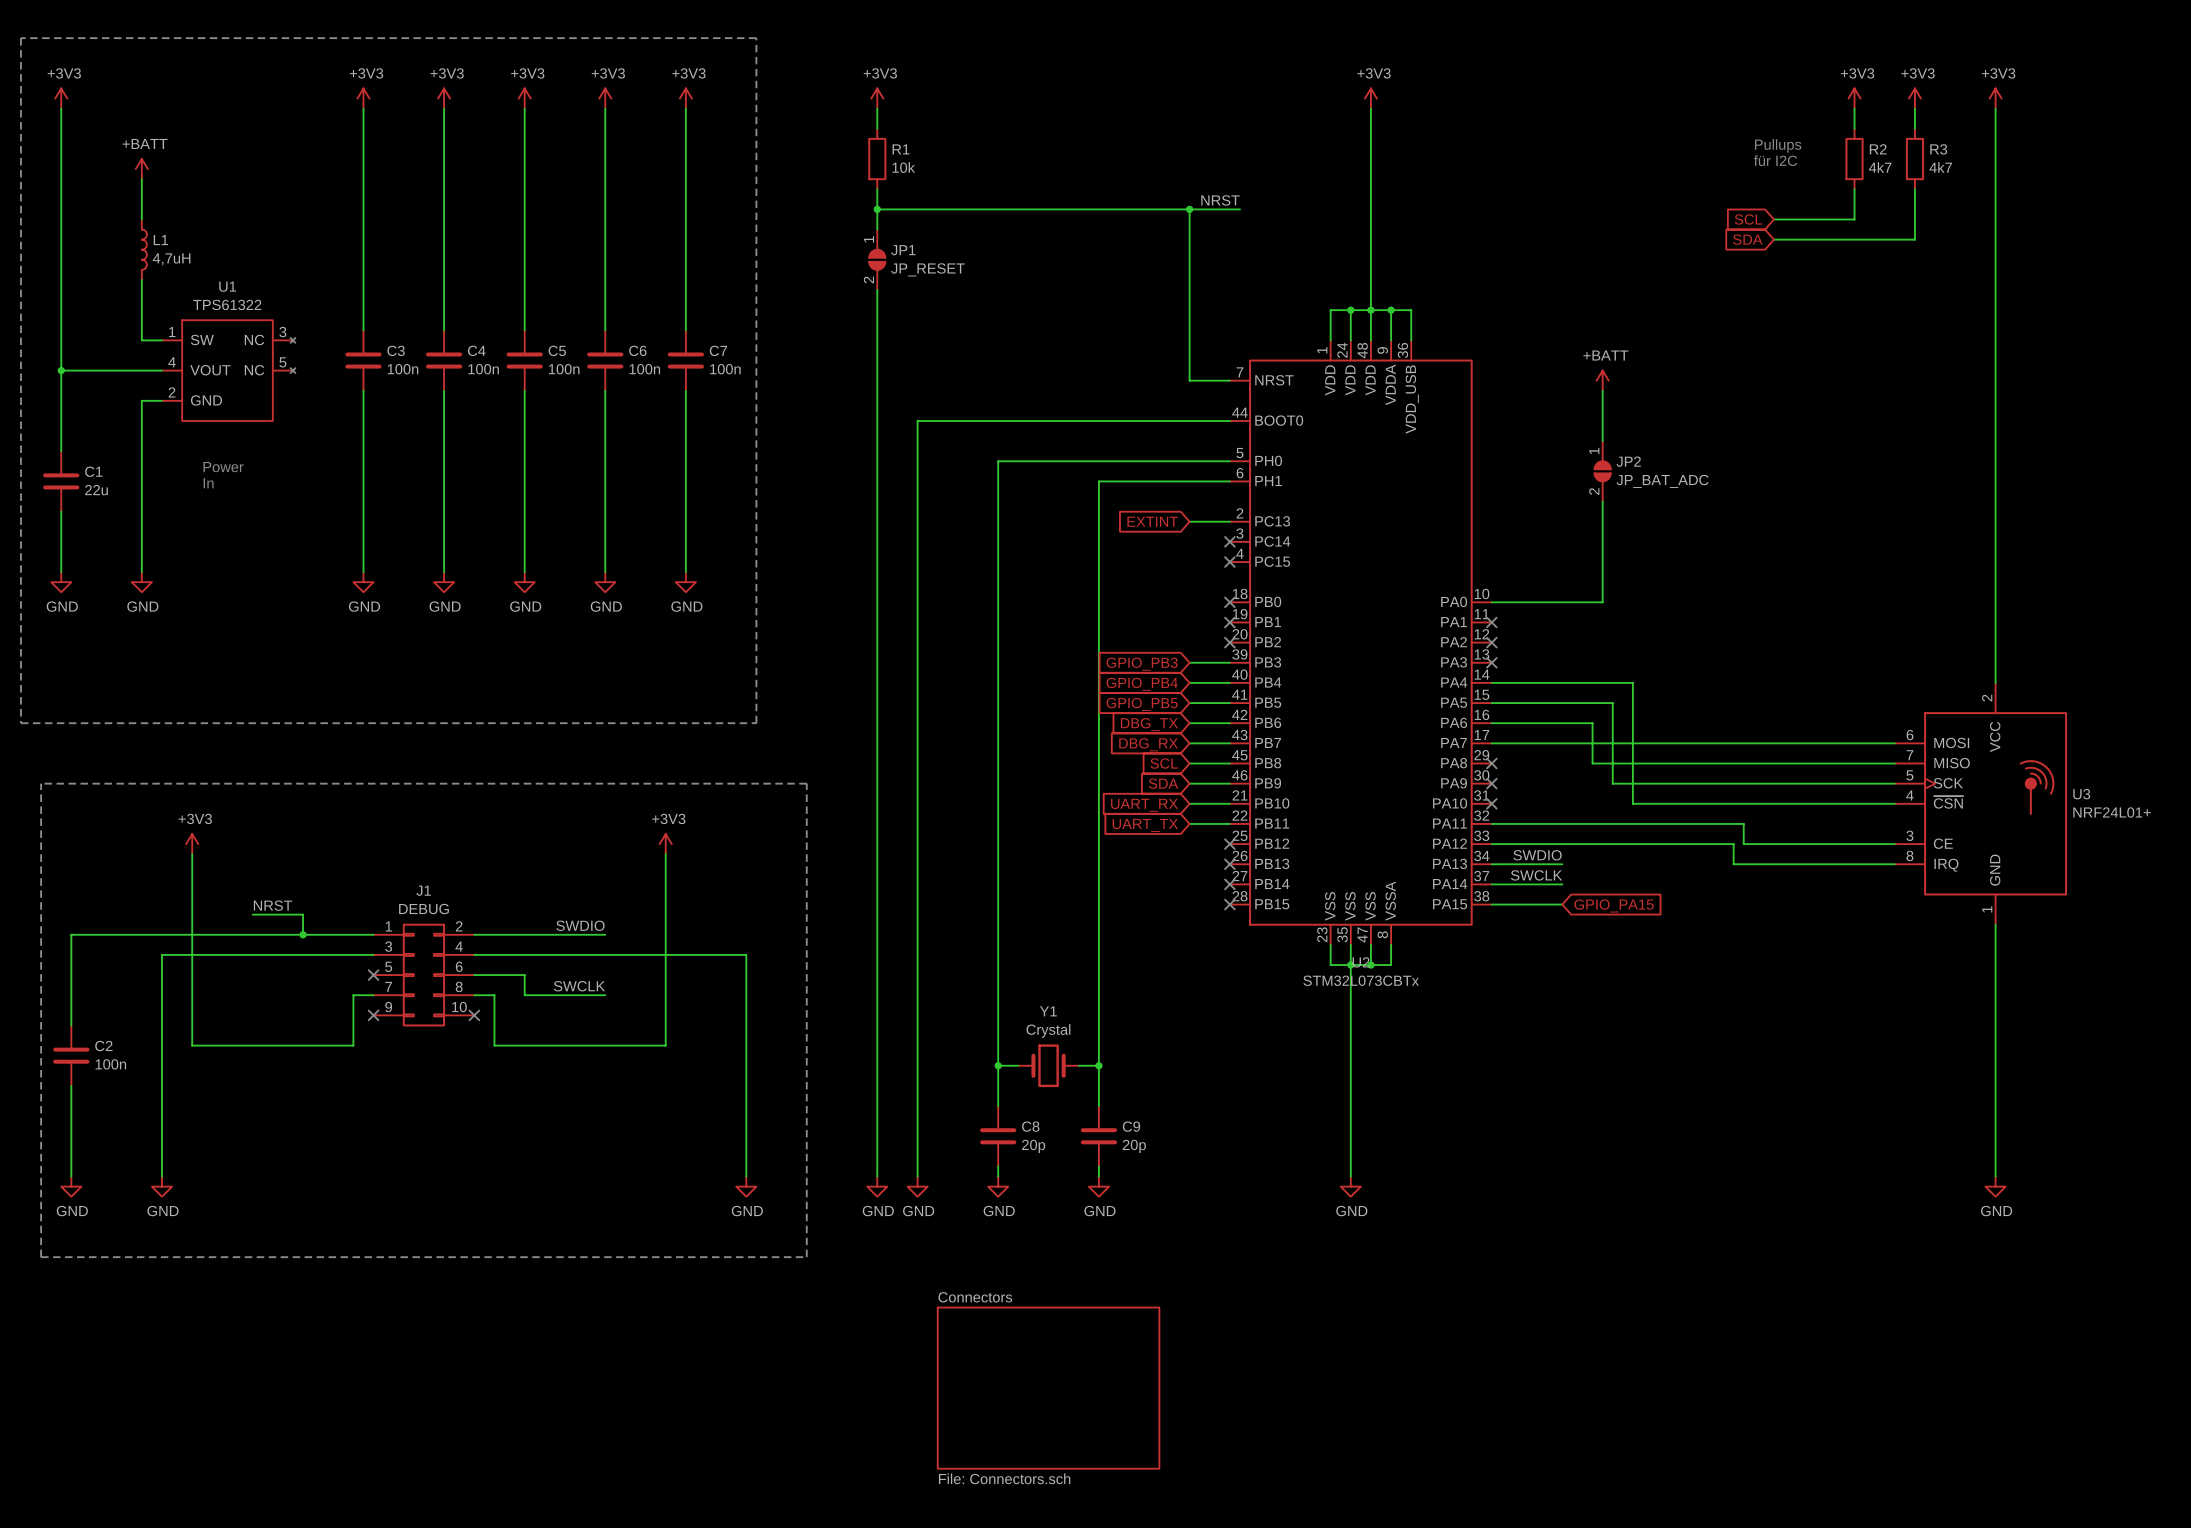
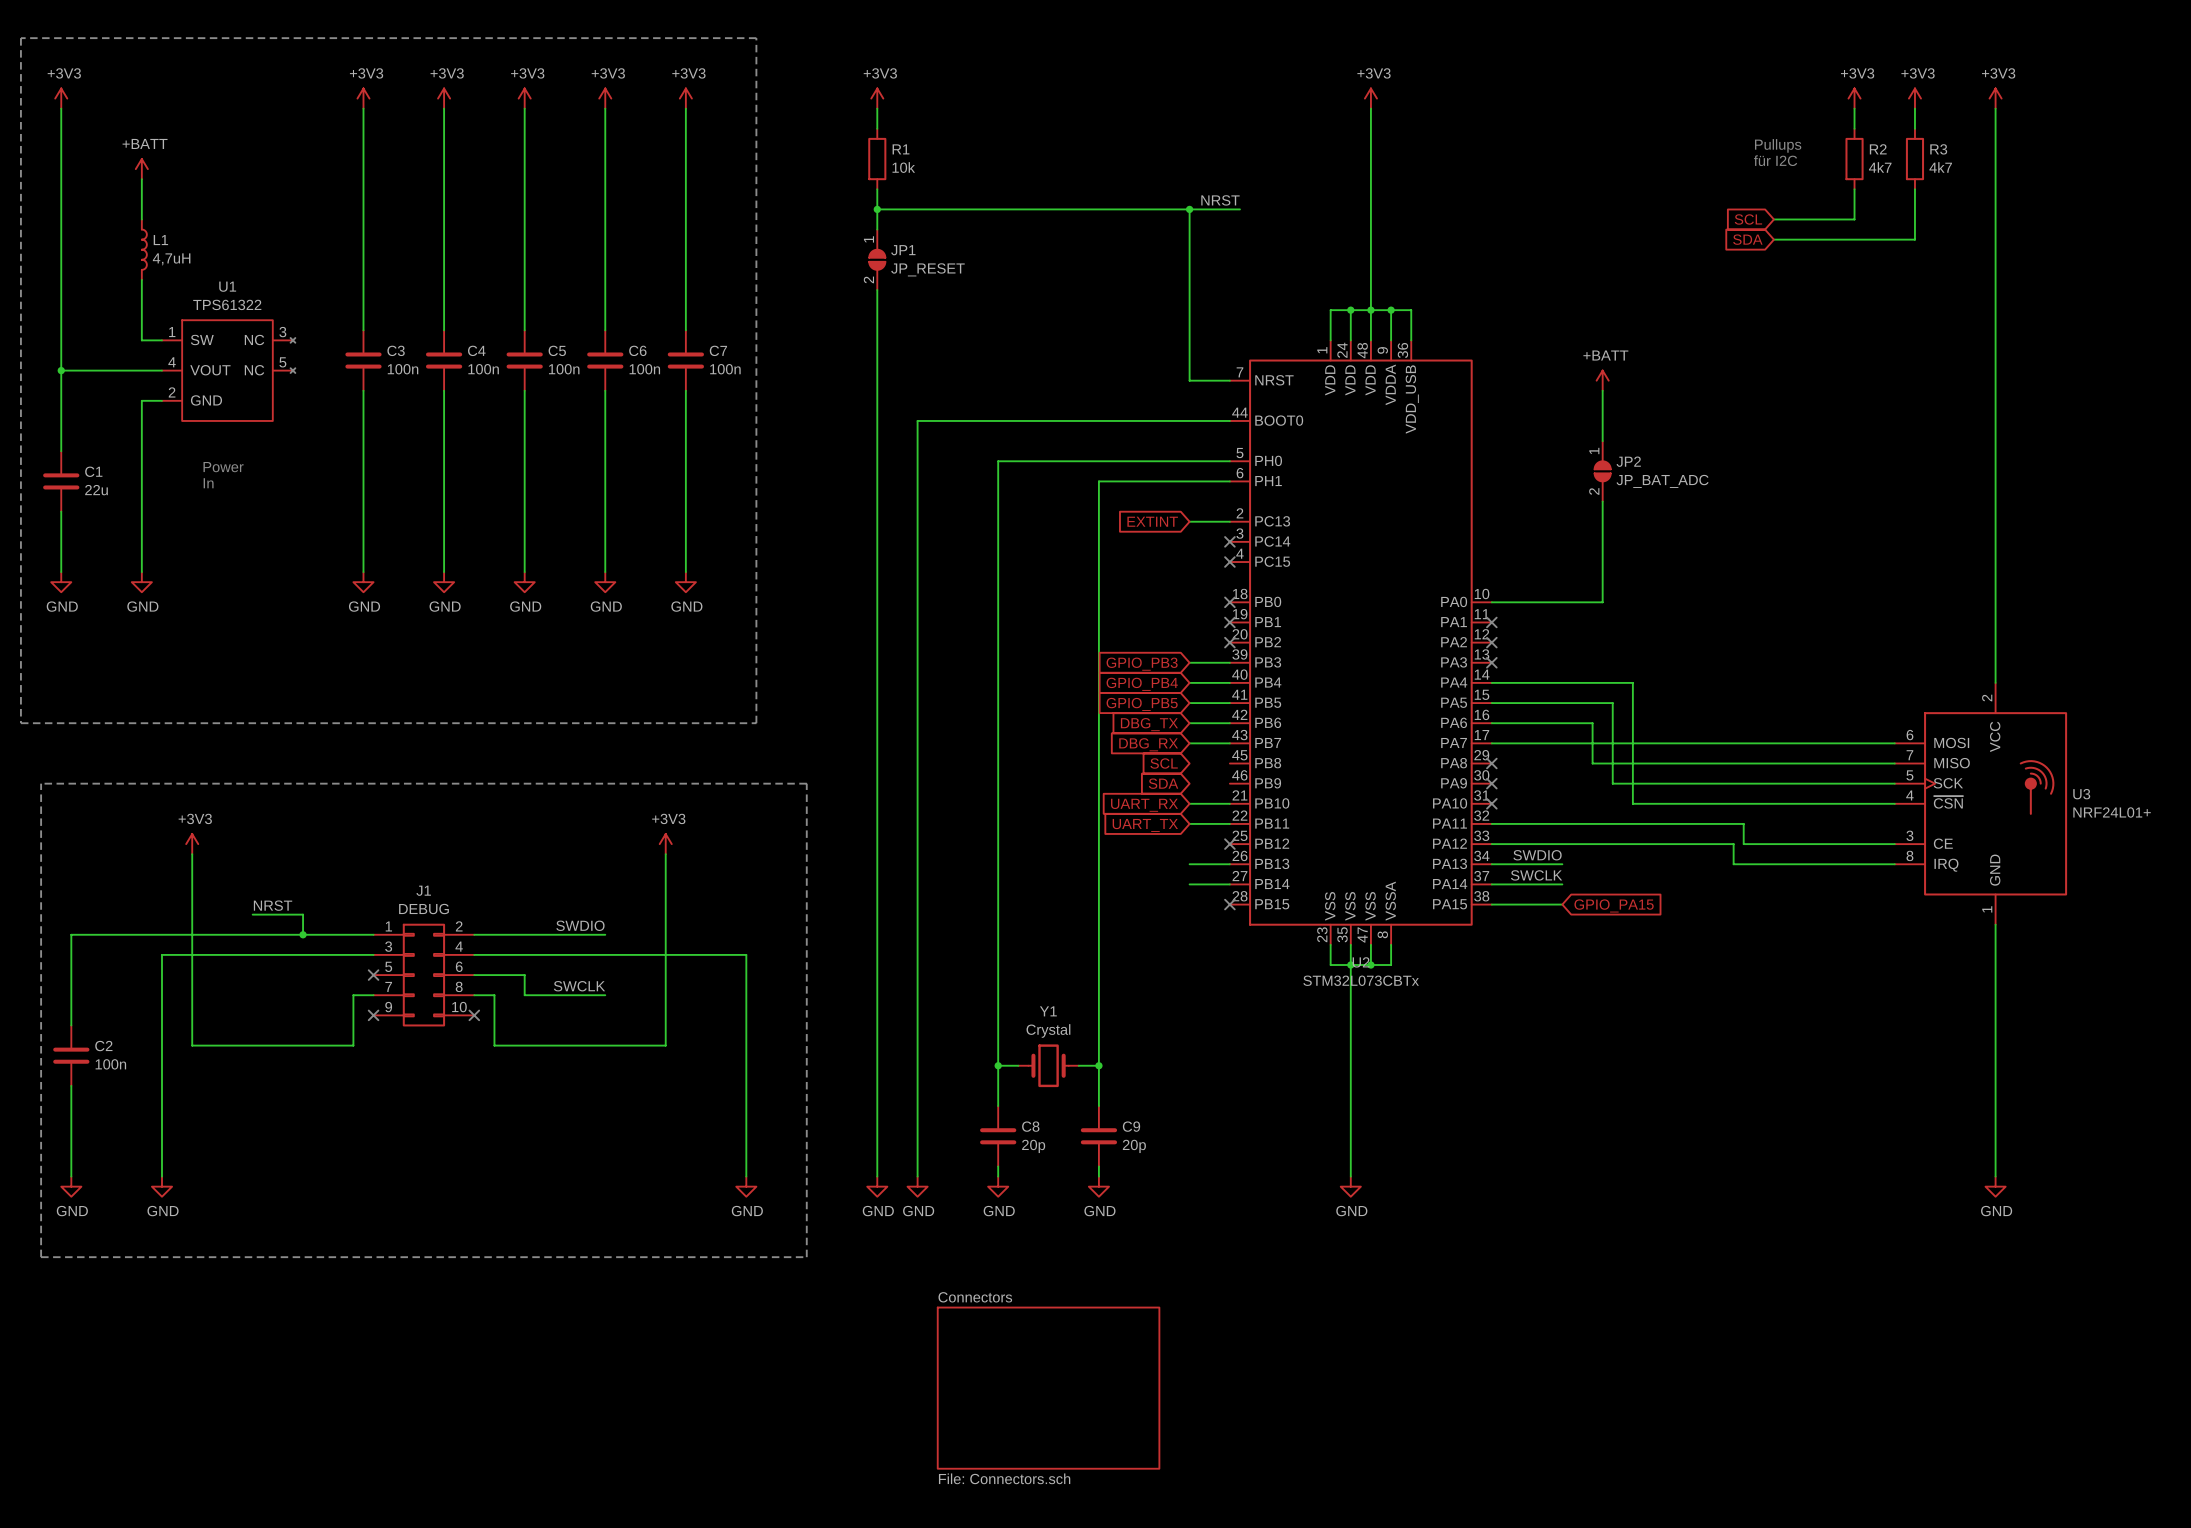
wire: (1189, 763) (1229, 763) -> (1189, 864) (1229, 864)
wire: (1189, 783) (1229, 783) -> (1189, 884) (1229, 884)
no-connect mark: (1229, 864) -> none
no-connect mark: (1229, 884) -> none

